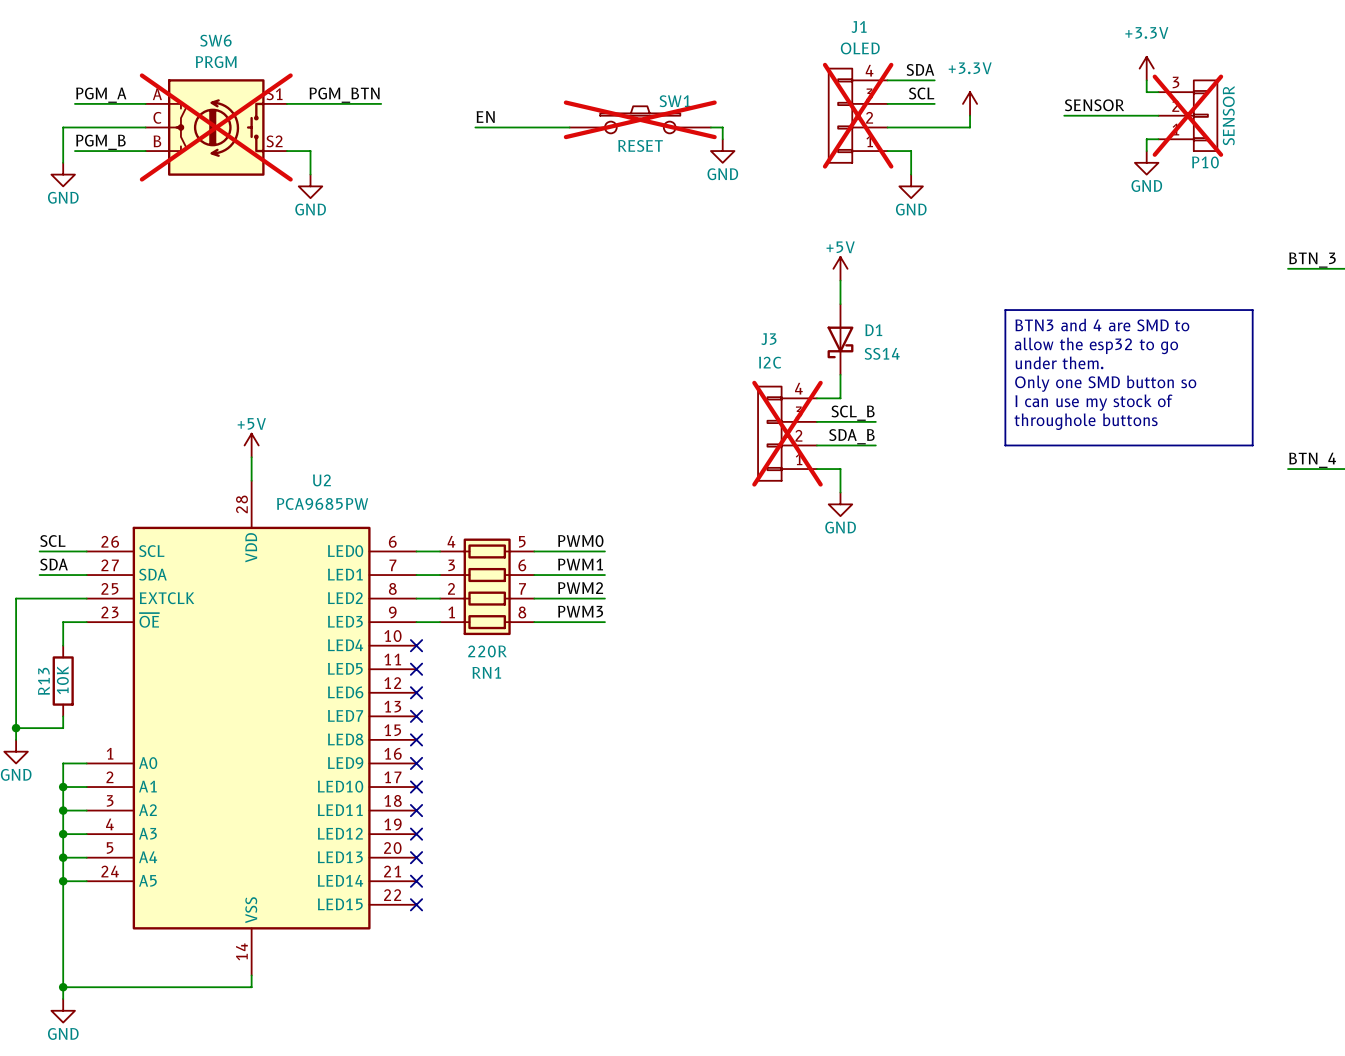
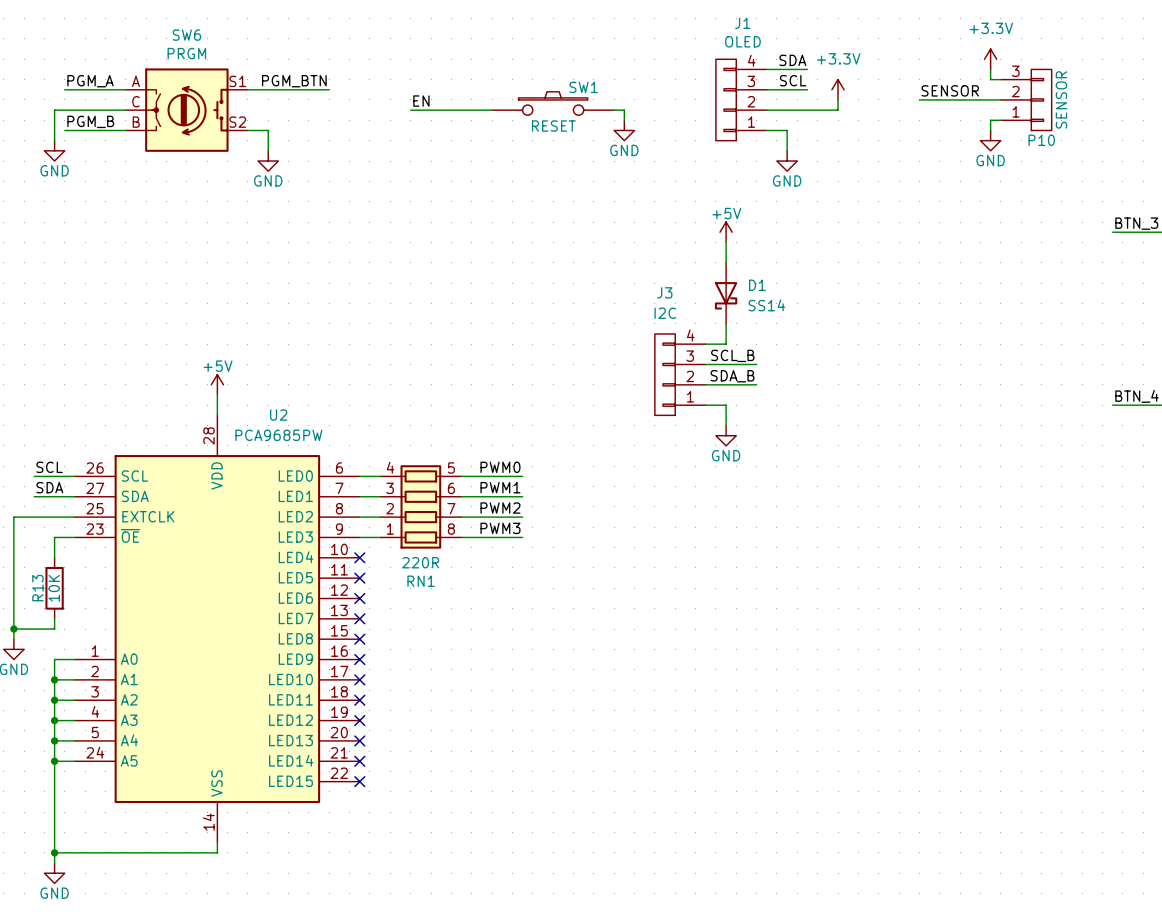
J1 do-not-place cross: (858, 115) -> none
P10 do-not-place cross: (1187, 115) -> none
SW1 do-not-place cross: (640, 119) -> none
SW6 do-not-place cross: (216, 127) -> none
line: (1005, 310) (1252, 310) (1252, 445) (1005, 445) (1005, 310) -> none
text: BTN3 and 4 are SMD to (1102, 324) -> none
text: allow the esp32 to go (1096, 345) -> none
text: under them. (1059, 362) -> none
text: Only one SMD button so (1105, 383) -> none
text: I can use my stock of (1093, 402) -> none
text: throughole buttons (1086, 421) -> none
J3 do-not-place cross: (787, 433) -> none

